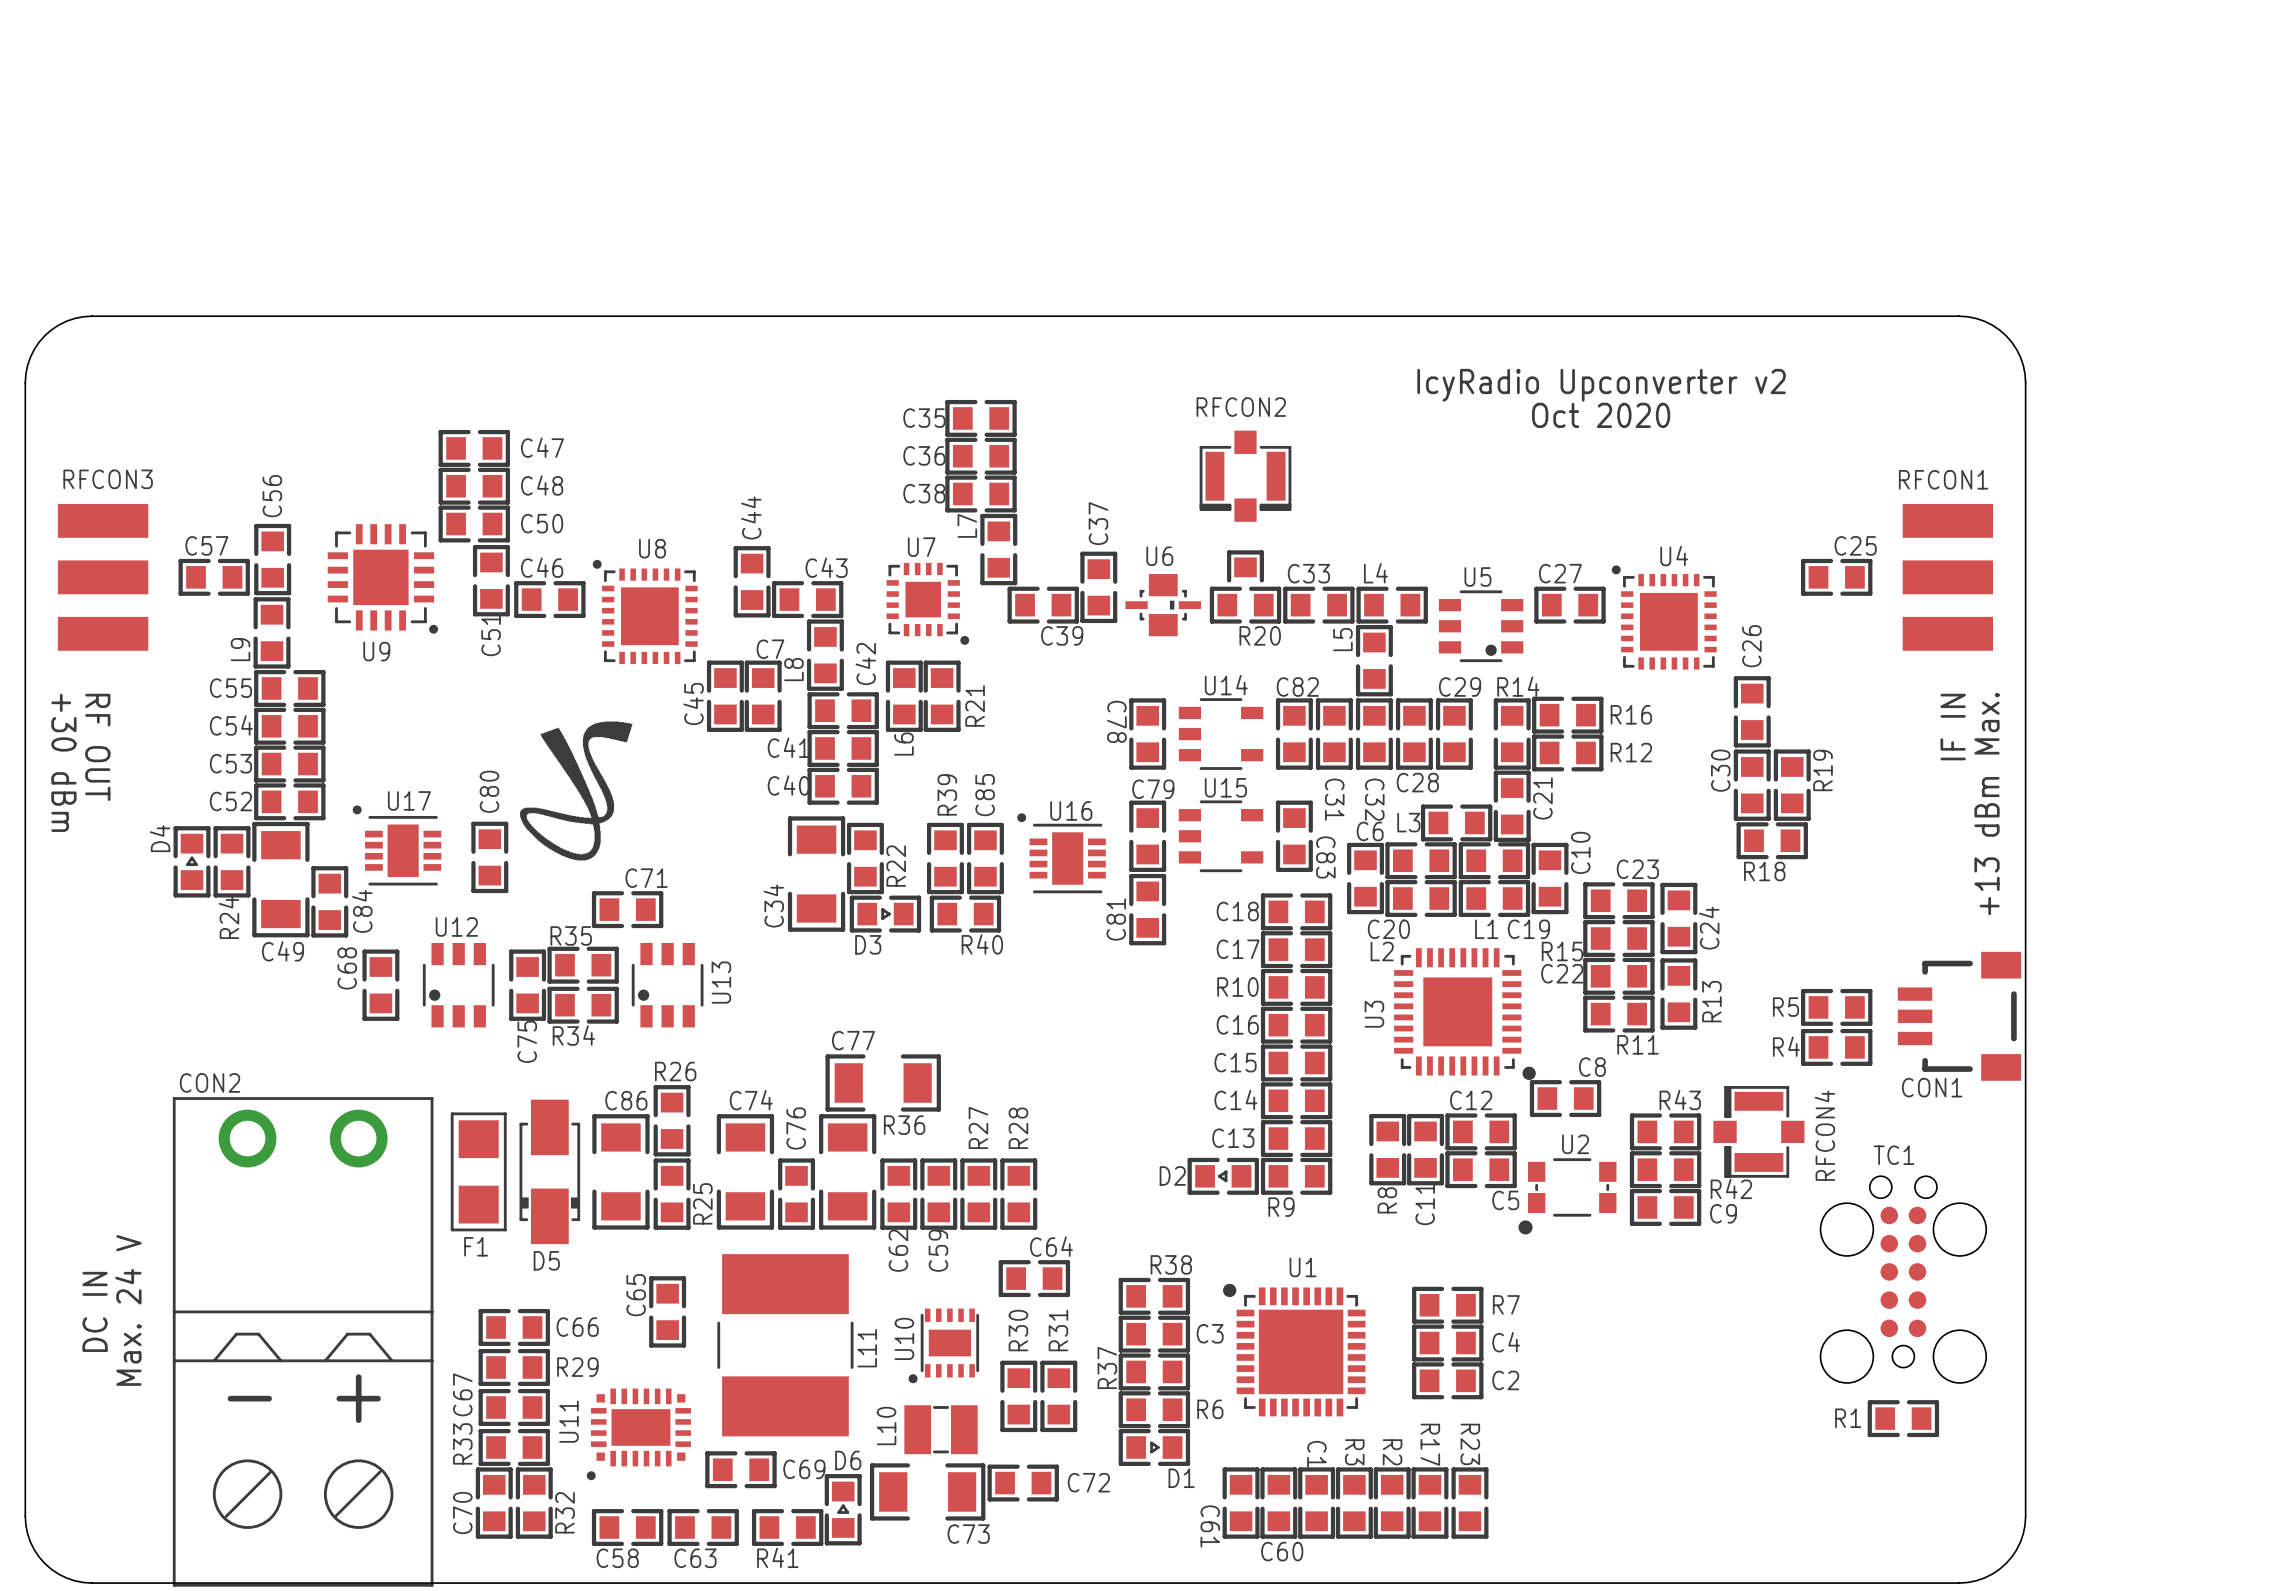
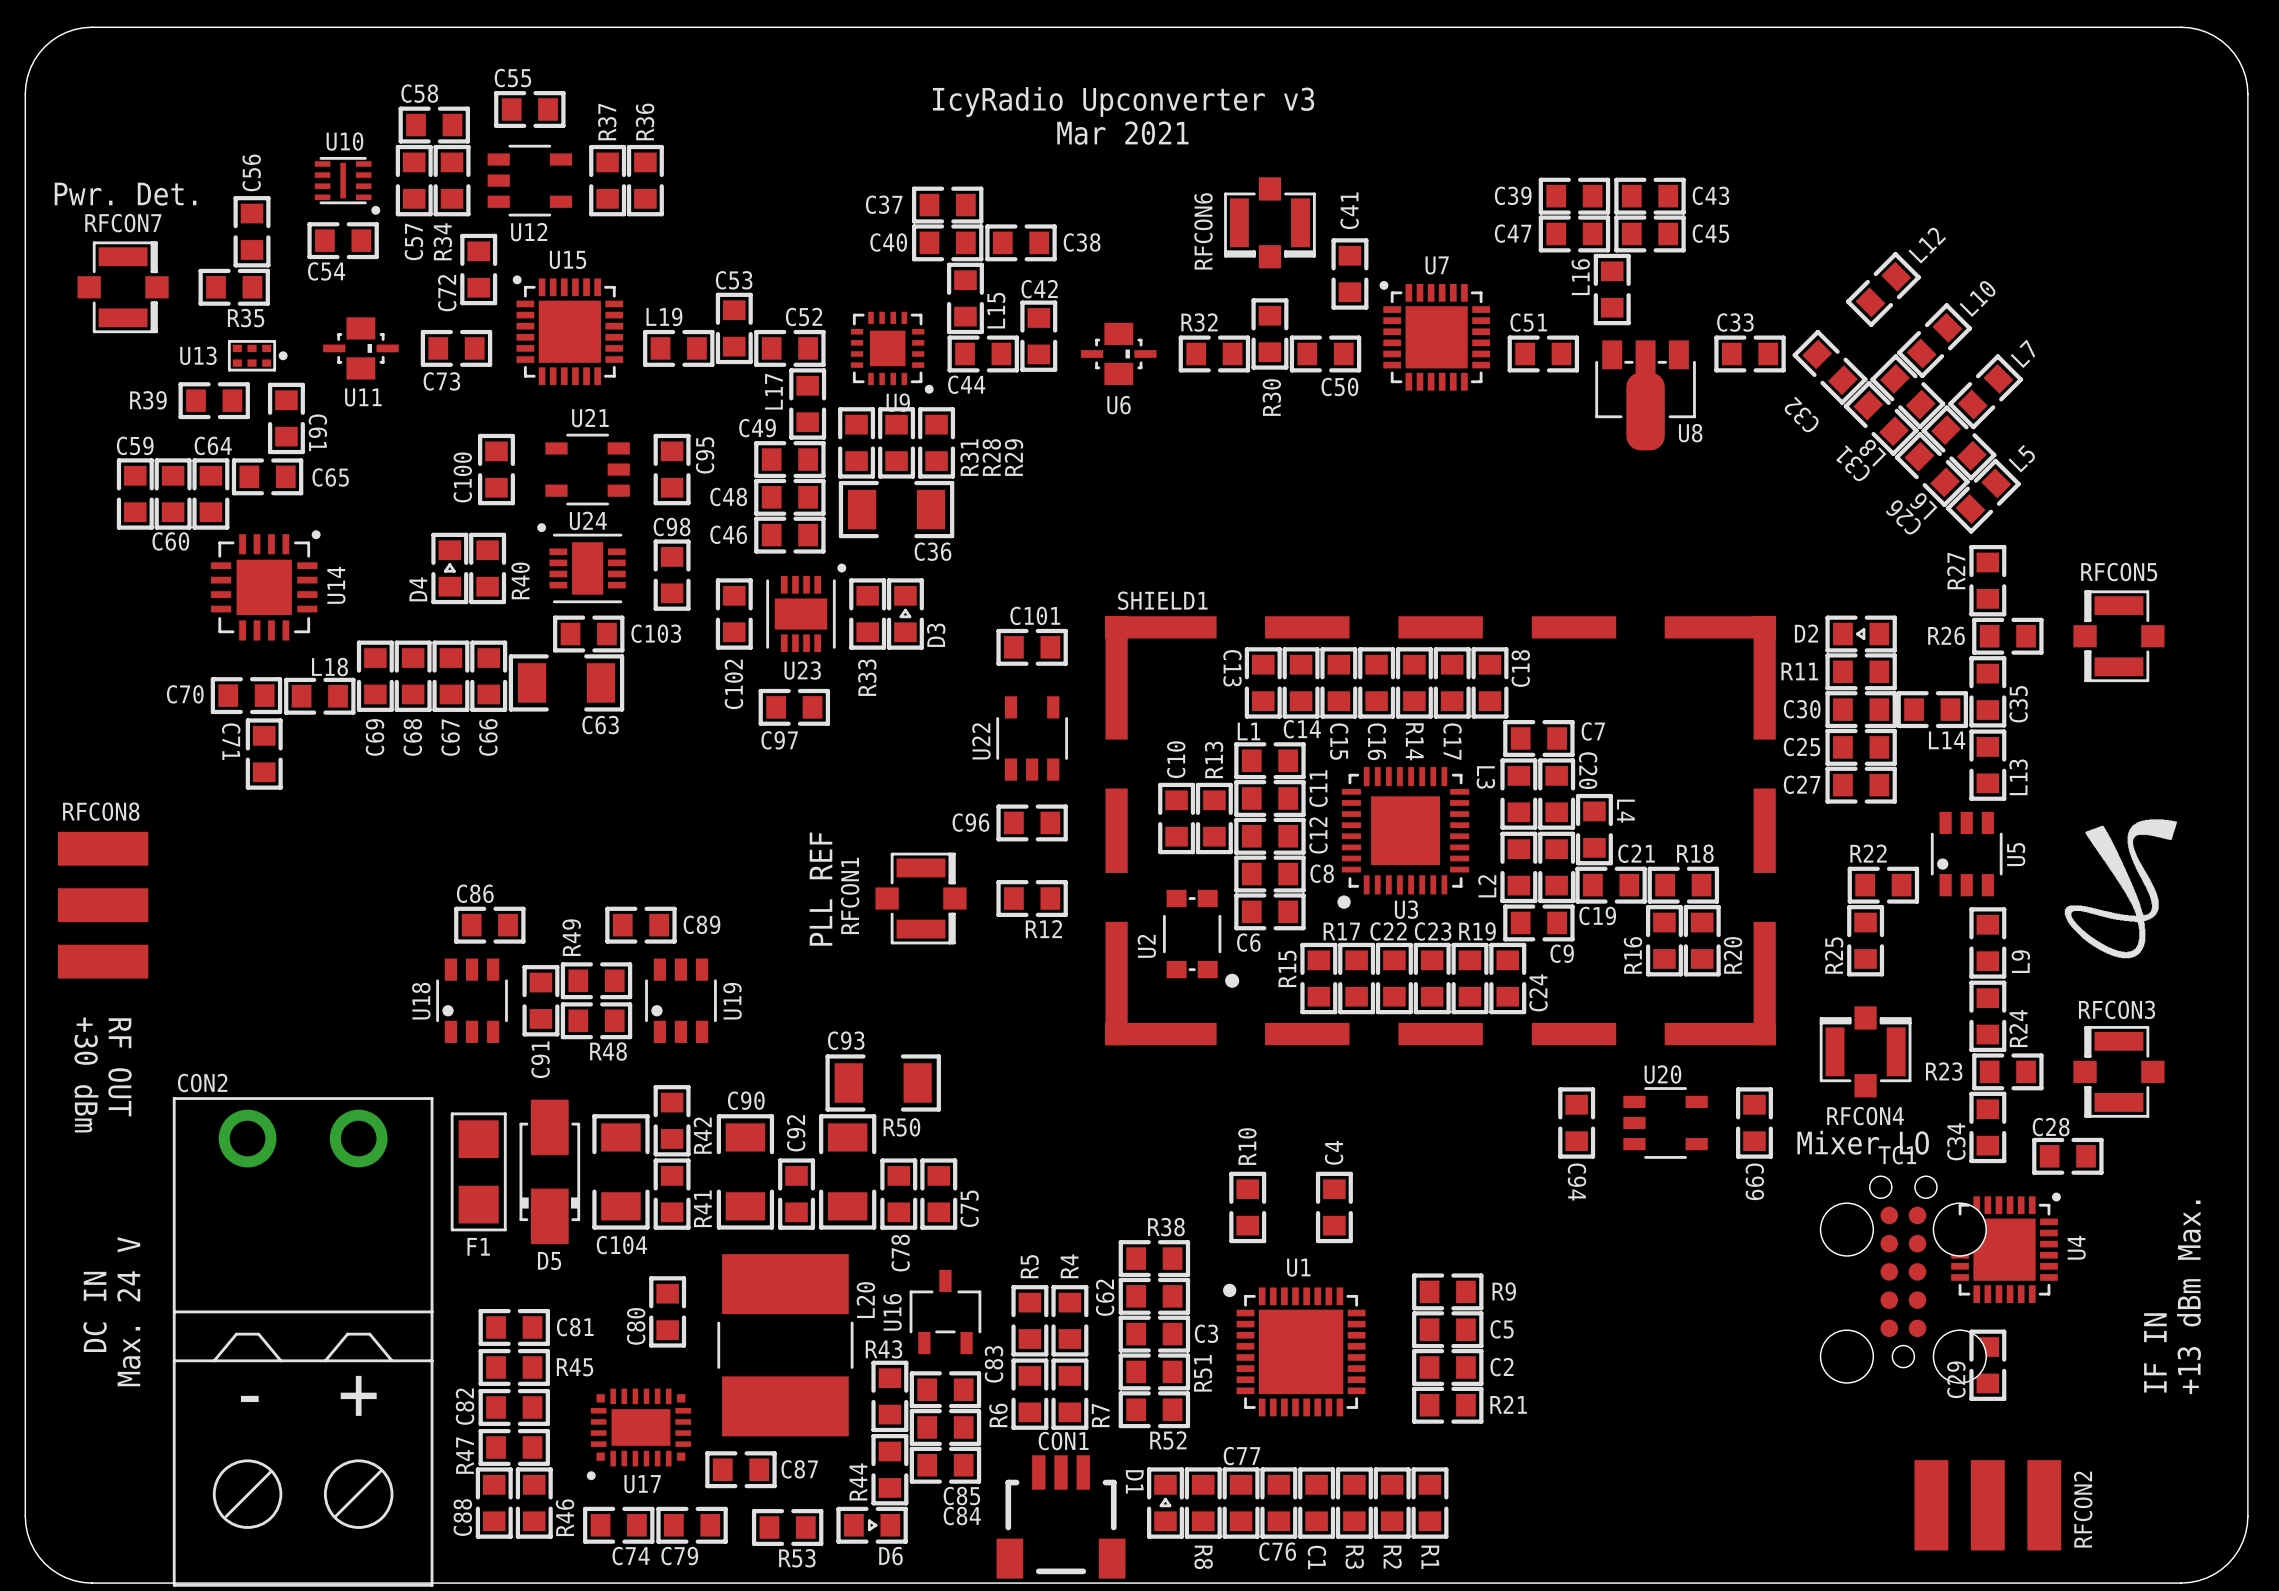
text: none -> IcyRadio Upconverter v3 (1123, 101)
text: none -> Mar 2021 (1122, 133)
R37: none -> (607, 180)
R36: none -> (645, 180)
text: none -> Pwr. Det. (125, 194)
RFCON6: none -> (1269, 222)
RFCON7: none -> (123, 287)
L16: none -> (1612, 289)
L12: none -> (1883, 289)
L15: none -> (965, 298)
U11: none -> (360, 348)
L19: none -> (678, 348)
R32: none -> (1214, 353)
board edge: (25, 382) (30, 357) (44, 335) (66, 321) (91, 316) (1958, 316) (1976, 318) (1992, 325) (2006, 335) (2016, 349) (2023, 365) (2025, 382) (2025, 1516) (2020, 1541) (2006, 1563) (1984, 1577) (1958, 1583) -> (25, 382) (25, 85) (34, 60) (44, 46) (58, 36) (83, 27) (2181, 27) (2198, 29) (2214, 36) (2228, 46) (2238, 60) (2245, 76) (2247, 93) (2247, 1525) (2242, 1541) (2234, 1556) (2221, 1569) (2198, 1580) (2181, 1583) (1958, 1583)
text: IcyRadio Upconverter v2 (1601, 385) -> none
L17: none -> (807, 403)
RFCON2 name position: RFCON2 (1241, 407) -> RFCON2 (2083, 1509)
text: Oct 2020 (1601, 415) -> none
C61: none -> (286, 418)
C35 name position: C35 (924, 418) -> C35 (2018, 704)
C35 rotation: 0° (981, 418) -> 90° clockwise (1987, 691)
C35 position: (981, 418) -> (1987, 691)
RFCON2 footprint: [1199, 430, 1292, 522] -> [1914, 1460, 2062, 1551]
C36 footprint: [945, 437, 1017, 475] -> [838, 480, 955, 539]
R29: none -> (936, 442)
C47 name position: C47 (542, 447) -> C47 (1513, 233)
C47 position: (474, 448) -> (1574, 233)
C36 name position: C36 (924, 455) -> C36 (932, 551)
C100: none -> (496, 469)
U21: none -> (587, 469)
C95: none -> (672, 469)
C65: none -> (267, 476)
RFCON1 name position: RFCON1 (1943, 479) -> RFCON1 (850, 895)
C48 name position: C48 (542, 485) -> C48 (728, 497)
C48 position: (474, 486) -> (789, 497)
C38 name position: C38 (924, 493) -> C38 (1082, 242)
C59: none -> (135, 494)
C60: none -> (173, 494)
C38 position: (981, 494) -> (1021, 242)
RFCON3 footprint: [57, 503, 149, 651] -> [2073, 1026, 2165, 1118]
RFCON1 footprint: [1902, 503, 1994, 651] -> [875, 852, 967, 945]
C44 name position: C44 (751, 518) -> C44 (966, 384)
C50 name position: C50 (542, 523) -> C50 (1339, 386)
C37 name position: C37 (1098, 523) -> C37 (884, 204)
U9 footprint: [327, 524, 439, 634] -> [850, 311, 934, 394]
C50 position: (474, 524) -> (1325, 353)
L7 name position: L7 (967, 525) -> L7 (2022, 353)
C57 name position: C57 (206, 545) -> C57 (413, 241)
C25 name position: C25 (1855, 545) -> C25 (1802, 747)
U8 name position: U8 (652, 548) -> U8 (1690, 433)
L7 rotation: 0° (998, 549) -> 45° clockwise (1985, 391)
L7 position: (998, 549) -> (1985, 391)
R20 footprint: [1209, 550, 1282, 624] -> [1683, 905, 1721, 977]
U6 name position: U6 (1159, 556) -> U6 (1119, 405)
U4 name position: U4 (1674, 556) -> U4 (2076, 1247)
C56 position: (272, 559) -> (252, 231)
U8 footprint: [592, 559, 698, 665] -> [1595, 340, 1696, 451]
U7 footprint: [886, 562, 970, 645] -> [1379, 280, 1490, 391]
U24: none -> (581, 563)
U4 footprint: [1611, 565, 1717, 670] -> [1951, 1192, 2061, 1304]
C46 name position: C46 (542, 567) -> C46 (728, 534)
C43 name position: C43 (826, 567) -> C43 (1710, 195)
C27 name position: C27 (1560, 573) -> C27 (1802, 784)
C98: none -> (672, 575)
C57 rotation: 0° (214, 577) -> 90° clockwise (414, 180)
C57 position: (214, 577) -> (414, 180)
C25 position: (1836, 577) -> (1861, 747)
C51 rotation: 0° (491, 580) -> 90° clockwise (1543, 353)
C51 position: (491, 580) -> (1543, 353)
C44 rotation: 0° (752, 581) -> 90° clockwise (983, 353)
C44 position: (752, 581) -> (983, 353)
C37 rotation: 0° (1098, 587) -> 90° clockwise (947, 205)
C37 position: (1098, 587) -> (947, 205)
C46 position: (549, 599) -> (789, 535)
C43 position: (807, 599) -> (1650, 196)
C39 position: (1043, 605) -> (1574, 196)
U6 position: (1163, 605) -> (1118, 353)
C33 position: (1318, 605) -> (1750, 353)
L4 rotation: 0° (1392, 605) -> 90° clockwise (1594, 829)
L4 position: (1392, 605) -> (1594, 829)
C27 position: (1570, 605) -> (1861, 785)
U23: none -> (806, 607)
C102: none -> (734, 614)
R33: none -> (867, 614)
U5 rotation: 0° (1481, 626) -> 90° clockwise (1966, 854)
U5 position: (1481, 626) -> (1966, 854)
L9 position: (272, 632) -> (1987, 942)
C103: none -> (588, 634)
C51 name position: C51 (491, 635) -> C51 (1528, 322)
C39 name position: C39 (1062, 635) -> C39 (1513, 195)
R20 name position: R20 (1260, 635) -> R20 (1733, 955)
R26: none -> (2007, 636)
RFCON5: none -> (2118, 636)
L5 name position: L5 (1342, 639) -> L5 (2021, 458)
C26 name position: C26 (1751, 646) -> C26 (1903, 517)
C101: none -> (1032, 647)
L9 name position: L9 (240, 649) -> L9 (2020, 961)
L8 rotation: 0° (825, 655) -> 45° counterclockwise (1907, 391)
L8 position: (825, 655) -> (1907, 391)
L5 rotation: 0° (1374, 660) -> 45° clockwise (1983, 496)
L5 position: (1374, 660) -> (1983, 496)
C69: none -> (375, 676)
C67: none -> (450, 676)
C66: none -> (488, 676)
U14 name position: U14 (1226, 685) -> U14 (336, 585)
R14 name rotation: 0° (1518, 686) -> 90° clockwise (1414, 741)
R14 name position: R14 (1518, 686) -> R14 (1414, 741)
C29 name rotation: 0° (1460, 687) -> 90° counterclockwise (1956, 1379)
C29 name position: C29 (1460, 687) -> C29 (1956, 1379)
C55 name position: C55 (230, 688) -> C55 (512, 78)
C55 position: (289, 688) -> (529, 109)
C70: none -> (246, 695)
L18: none -> (319, 696)
C45 rotation: 0° (725, 696) -> 90° clockwise (1650, 233)
C45 position: (725, 696) -> (1650, 233)
C7 rotation: 0° (763, 696) -> 90° clockwise (1538, 738)
C7 position: (763, 696) -> (1538, 738)
L6 rotation: 0° (904, 696) -> 45° counterclockwise (1958, 442)
L6 position: (904, 696) -> (1958, 442)
R21 rotation: 0° (942, 696) -> 90° clockwise (1447, 1405)
R21 position: (942, 696) -> (1447, 1405)
U14 footprint: [1178, 698, 1264, 770] -> [211, 530, 321, 641]
C45 name position: C45 (693, 704) -> C45 (1710, 233)
C97: none -> (794, 707)
L14: none -> (1932, 709)
C42 rotation: 0° (843, 710) -> 90° clockwise (1038, 336)
C42 position: (843, 710) -> (1038, 336)
C26 rotation: 0° (1752, 711) -> 45° counterclockwise (1932, 469)
C26 position: (1752, 711) -> (1932, 469)
R16 name position: R16 (1631, 714) -> R16 (1633, 955)
R16 rotation: 0° (1567, 715) -> 90° clockwise (1664, 940)
R16 position: (1567, 715) -> (1664, 940)
drawing: [520, 721, 633, 861] -> none
C54 name position: C54 (231, 725) -> C54 (326, 271)
C54 position: (289, 726) -> (343, 240)
text: IF IN (1953, 727) -> none
C78: (1147, 734) -> none
C82: (1294, 734) -> none
C31 rotation: 0° (1334, 734) -> 45° counterclockwise (1881, 418)
C31 position: (1334, 734) -> (1881, 418)
C32 rotation: 0° (1374, 734) -> 45° counterclockwise (1830, 367)
C32 position: (1374, 734) -> (1830, 367)
C28 rotation: 0° (1414, 734) -> 90° clockwise (2067, 1156)
C28 position: (1414, 734) -> (2067, 1156)
C29 position: (1454, 734) -> (1987, 1365)
R14 position: (1512, 734) -> (1414, 682)
U22: none -> (1032, 738)
text position: RF OUT (97, 747) -> RF OUT (120, 1067)
C41 rotation: 0° (843, 748) -> 90° clockwise (1349, 273)
C41 position: (843, 748) -> (1349, 273)
R12 position: (1567, 752) -> (1032, 898)
R12 name position: R12 (1631, 752) -> R12 (1043, 929)
text position: +30 dBm (63, 762) -> +30 dBm (86, 1074)
C53 rotation: 0° (289, 764) -> 90° clockwise (734, 328)
C53 position: (289, 764) -> (734, 328)
L13: none -> (1987, 765)
R19 name rotation: 0° (1823, 770) -> 90° clockwise (1477, 931)
C28 name position: C28 (1417, 782) -> C28 (2051, 1127)
C30 rotation: 0° (1752, 785) -> 90° clockwise (1861, 709)
C30 position: (1752, 785) -> (1861, 709)
R19 position: (1792, 785) -> (1469, 978)
C40 position: (843, 786) -> (947, 242)
C79 name position: C79 (1153, 789) -> C79 (679, 1556)
R39 name position: R39 (947, 794) -> R39 (148, 400)
C85 name position: C85 (985, 795) -> C85 (961, 1496)
U15 footprint: [1178, 800, 1264, 873] -> [512, 275, 624, 386]
C52 name position: C52 (230, 801) -> C52 (804, 316)
C52 position: (289, 801) -> (789, 348)
text: +13 dBm Max. (1987, 803) -> none
C21 rotation: 0° (1512, 806) -> 90° clockwise (1611, 885)
C21 position: (1512, 806) -> (1611, 885)
U16 name position: U16 (1071, 810) -> U16 (892, 1312)
U16 footprint: [1017, 813, 1106, 894] -> [909, 1269, 982, 1355]
C34 footprint: [787, 816, 846, 932] -> [1969, 1091, 2007, 1164]
drawing: none -> [2064, 819, 2178, 959]
C49 footprint: [252, 821, 310, 938] -> [754, 441, 826, 479]
C96: none -> (1032, 822)
L3 rotation: 0° (1456, 822) -> 90° clockwise (1518, 794)
L3 position: (1456, 822) -> (1518, 794)
SHIELD1: none -> (1440, 830)
C6 name position: C6 (1370, 831) -> C6 (1248, 942)
C79 rotation: 0° (1147, 836) -> 90° clockwise (692, 1525)
C79 position: (1147, 836) -> (692, 1525)
C83 rotation: 0° (1294, 836) -> 90° clockwise (945, 1389)
C83 position: (1294, 836) -> (945, 1389)
D4 name position: D4 (160, 838) -> D4 (418, 589)
R18 position: (1772, 840) -> (1683, 885)
U17: (396, 845) -> none
C10 name position: C10 (1580, 852) -> C10 (1176, 759)
C80: (489, 857) -> none
C83 name position: C83 (1325, 857) -> C83 (994, 1364)
R22 rotation: 0° (865, 858) -> 90° clockwise (1883, 885)
R22 position: (865, 858) -> (1883, 885)
R39 rotation: 0° (945, 858) -> 90° clockwise (214, 400)
R39 position: (945, 858) -> (214, 400)
C85 rotation: 0° (985, 858) -> 90° clockwise (945, 1427)
C85 position: (985, 858) -> (945, 1427)
C20 rotation: 0° (1421, 860) -> 90° clockwise (1556, 794)
C20 position: (1421, 860) -> (1556, 794)
C19 rotation: 0° (1494, 860) -> 90° clockwise (1556, 867)
C19 position: (1494, 860) -> (1556, 867)
D4 position: (192, 861) -> (449, 568)
R24 position: (232, 861) -> (1987, 1016)
R22 name position: R22 (896, 866) -> R22 (1868, 853)
R18 name position: R18 (1764, 871) -> R18 (1695, 853)
C71 name position: C71 (646, 878) -> C71 (231, 741)
C6 rotation: 0° (1365, 878) -> 90° clockwise (1269, 911)
C6 position: (1365, 878) -> (1269, 911)
C10 position: (1549, 878) -> (1176, 818)
text: none -> PLL REF (820, 889)
L2 rotation: 0° (1421, 898) -> 90° clockwise (1518, 867)
L2 position: (1421, 898) -> (1518, 867)
L1 position: (1494, 898) -> (1269, 760)
C23 rotation: 0° (1618, 900) -> 90° clockwise (1432, 978)
C23 position: (1618, 900) -> (1432, 978)
C84 rotation: 0° (329, 901) -> 90° clockwise (945, 1465)
C84 position: (329, 901) -> (945, 1465)
RFCON8: none -> (103, 905)
C71 rotation: 0° (627, 909) -> 90° clockwise (264, 754)
C71 position: (627, 909) -> (264, 754)
C81: (1147, 909) -> none
C18 name position: C18 (1237, 911) -> C18 (1520, 668)
C18 rotation: 0° (1296, 911) -> 90° clockwise (1489, 682)
C18 position: (1296, 911) -> (1489, 682)
D3 rotation: 0° (885, 914) -> 90° counterclockwise (905, 614)
D3 position: (885, 914) -> (905, 614)
R40 rotation: 0° (965, 914) -> 90° clockwise (487, 568)
R40 position: (965, 914) -> (487, 568)
R24 name position: R24 (229, 917) -> R24 (2018, 1028)
C24 position: (1678, 918) -> (1507, 978)
C86: none -> (489, 925)
C89: none -> (640, 925)
U12 name position: U12 (456, 927) -> U12 (529, 232)
C20 name position: C20 (1388, 929) -> C20 (1588, 770)
L1 name position: L1 (1486, 929) -> L1 (1249, 731)
R35 name position: R35 (571, 935) -> R35 (246, 318)
R15 rotation: 0° (1618, 938) -> 90° clockwise (1318, 978)
R15 position: (1618, 938) -> (1318, 978)
R25: none -> (1865, 940)
U12 footprint: [422, 942, 495, 1028] -> [487, 144, 573, 217]
U13 footprint: [631, 942, 704, 1028] -> [227, 340, 288, 372]
C17 name position: C17 (1238, 949) -> C17 (1452, 741)
C17 rotation: 0° (1296, 949) -> 90° clockwise (1452, 682)
C17 position: (1296, 949) -> (1452, 682)
C49 name position: C49 (282, 951) -> C49 (757, 428)
R35 position: (583, 965) -> (234, 287)
C68 name position: C68 (347, 968) -> C68 (412, 737)
C22 rotation: 0° (1618, 976) -> 90° clockwise (1394, 978)
C22 position: (1618, 976) -> (1394, 978)
R17: none -> (1356, 978)
R49: none -> (596, 980)
U13 name position: U13 (721, 982) -> U13 (198, 355)
C68 position: (380, 985) -> (413, 676)
C75 position: (527, 985) -> (540, 1000)
R10 rotation: 0° (1296, 987) -> 90° clockwise (1247, 1207)
R10 position: (1296, 987) -> (1247, 1207)
R13 position: (1678, 994) -> (1214, 818)
U18: none -> (472, 1000)
U19: none -> (680, 1000)
R13 name position: R13 (1711, 1001) -> R13 (1214, 759)
R34 rotation: 0° (583, 1005) -> 90° clockwise (452, 180)
R34 position: (583, 1005) -> (452, 180)
R5 rotation: 0° (1836, 1007) -> 90° clockwise (1029, 1320)
R5 position: (1836, 1007) -> (1029, 1320)
U3 name position: U3 (1374, 1014) -> U3 (1406, 909)
U3 rotation: 0° (1464, 1014) -> 90° clockwise (1403, 837)
U3 position: (1464, 1014) -> (1403, 837)
R11 position: (1618, 1014) -> (1861, 671)
CON1 rotation: 0° (1959, 1016) -> 90° clockwise (1061, 1516)
CON1 position: (1959, 1016) -> (1061, 1516)
R48: none -> (596, 1020)
C16 name position: C16 (1237, 1024) -> C16 (1376, 741)
C16 rotation: 0° (1296, 1025) -> 90° clockwise (1376, 682)
C16 position: (1296, 1025) -> (1376, 682)
C77 name: C77 (853, 1040) -> C93 (846, 1040)
C75 name: C75 (527, 1041) -> C91 (540, 1059)
R11 name position: R11 (1638, 1044) -> R11 (1799, 671)
R4 rotation: 0° (1836, 1047) -> 90° clockwise (1069, 1320)
R4 position: (1836, 1047) -> (1069, 1320)
C15 name position: C15 (1235, 1062) -> C15 (1339, 741)
C15 rotation: 0° (1296, 1062) -> 90° clockwise (1338, 682)
C15 position: (1296, 1062) -> (1338, 682)
C8 name position: C8 (1592, 1067) -> C8 (1322, 873)
R26 name: R26 (675, 1071) -> R42 (702, 1135)
CON1 name position: CON1 (1932, 1087) -> CON1 (1063, 1441)
C8 position: (1565, 1098) -> (1269, 874)
C14 name position: C14 (1235, 1099) -> C14 (1302, 729)
C86 name: C86 (626, 1100) -> C104 (621, 1245)
C74 name: C74 (751, 1100) -> C90 (746, 1100)
C14 rotation: 0° (1296, 1100) -> 90° clockwise (1301, 682)
C14 position: (1296, 1100) -> (1301, 682)
C12 name rotation: 0° (1471, 1100) -> 90° counterclockwise (1318, 835)
C12 name position: C12 (1471, 1100) -> C12 (1318, 835)
C94: none -> (1576, 1122)
U20: none -> (1665, 1122)
C99: none -> (1754, 1122)
R36 name: R36 (904, 1125) -> R50 (901, 1127)
R27 name position: R27 (978, 1127) -> R27 (1956, 571)
C76 name: C76 (796, 1128) -> C92 (796, 1133)
R28 name position: R28 (1018, 1128) -> R28 (991, 457)
C12 position: (1481, 1131) -> (1269, 836)
R43 rotation: 0° (1665, 1131) -> 90° clockwise (889, 1396)
R43 position: (1665, 1131) -> (889, 1396)
RFCON4 rotation: 0° (1758, 1131) -> 90° clockwise (1865, 1051)
RFCON4 position: (1758, 1131) -> (1865, 1051)
C13 rotation: 0° (1296, 1138) -> 90° clockwise (1263, 682)
C13 position: (1296, 1138) -> (1263, 682)
text: none -> Mixer LO (1863, 1142)
R8 position: (1387, 1149) -> (1203, 1503)
C11 rotation: 0° (1425, 1149) -> 90° clockwise (1269, 798)
C11 position: (1425, 1149) -> (1269, 798)
C5 position: (1481, 1169) -> (1447, 1329)
R42: (1665, 1169) -> none
D2 position: (1223, 1176) -> (1861, 634)
R9 position: (1296, 1176) -> (1447, 1291)
R27 position: (978, 1194) -> (1987, 580)
R28 position: (1018, 1194) -> (896, 442)
U2 rotation: 0° (1567, 1196) -> 90° counterclockwise (1201, 938)
U2 position: (1567, 1196) -> (1201, 938)
R8 name rotation: 0° (1387, 1200) -> 180° (1203, 1557)
C5 name position: C5 (1505, 1200) -> C5 (1502, 1329)
R25 name: R25 (702, 1203) -> R41 (702, 1208)
C11 name position: C11 (1425, 1204) -> C11 (1318, 788)
R9 name position: R9 (1281, 1207) -> R9 (1504, 1291)
C9 position: (1665, 1207) -> (1538, 922)
C9 name position: C9 (1723, 1213) -> C9 (1562, 953)
C62 name: C62 (898, 1250) -> C78 (900, 1253)
C59 name: C59 (938, 1250) -> C75 (969, 1208)
R38: none -> (1154, 1258)
D5 name position: D5 (546, 1260) -> D5 (549, 1260)
R38 name: R38 (1171, 1264) -> C62 (1105, 1297)
C64 rotation: 0° (1034, 1278) -> 90° clockwise (210, 494)
C64 position: (1034, 1278) -> (210, 494)
text: none -> +13 dBm Max. (2188, 1297)
C65 name: C65 (636, 1295) -> C80 (636, 1326)
R7 rotation: 0° (1447, 1305) -> 90° clockwise (1069, 1394)
R7 position: (1447, 1305) -> (1069, 1394)
U10 footprint: [908, 1308, 980, 1384] -> [314, 156, 381, 215]
C66 name: C66 (577, 1327) -> C81 (575, 1327)
R30 name position: R30 (1018, 1330) -> R30 (1271, 397)
R31 name position: R31 (1058, 1330) -> R31 (969, 457)
C4 name position: C4 (1506, 1342) -> C4 (1334, 1152)
C4 rotation: 0° (1447, 1343) -> 90° clockwise (1334, 1207)
C4 position: (1447, 1343) -> (1334, 1207)
L11 name: L11 (867, 1348) -> L20 (865, 1300)
text: none -> IF IN (2155, 1352)
R29 name: R29 (577, 1367) -> R45 (575, 1367)
R37 name: R37 (1107, 1367) -> R51 (1203, 1373)
C2 position: (1447, 1380) -> (1447, 1367)
C67 name: C67 (462, 1394) -> C82 (465, 1406)
R6: none -> (1029, 1394)
R30 position: (1018, 1396) -> (1269, 333)
R31 position: (1058, 1396) -> (856, 442)
L10 footprint: [904, 1405, 978, 1455] -> [1897, 303, 1972, 379]
R6 name: R6 (1210, 1409) -> R52 (1168, 1440)
R1: (1903, 1418) -> none
U11 name: U11 (568, 1421) -> U17 (642, 1484)
L10 name position: L10 (886, 1426) -> L10 (1977, 298)
R33 name: R33 (462, 1443) -> R47 (465, 1455)
R17 name: R17 (1430, 1444) -> R1 (1430, 1557)
R23 name position: R23 (1470, 1444) -> R23 (1944, 1071)
D1 rotation: 0° (1154, 1447) -> 90° counterclockwise (1165, 1503)
D1 position: (1154, 1447) -> (1165, 1503)
R3 name position: R3 (1354, 1452) -> R3 (1354, 1557)
R2 name position: R2 (1392, 1452) -> R2 (1392, 1557)
C1 name position: C1 (1316, 1454) -> C1 (1316, 1557)
C73 footprint: [869, 1463, 986, 1521] -> [420, 329, 493, 367]
C69 name: C69 (804, 1469) -> C87 (799, 1469)
R44: none -> (889, 1469)
D1 name position: D1 (1181, 1478) -> D1 (1134, 1481)
C72 name position: C72 (1088, 1482) -> C72 (447, 293)
C72 rotation: 0° (1023, 1483) -> 90° clockwise (478, 269)
C72 position: (1023, 1483) -> (478, 269)
R23 rotation: 0° (1469, 1503) -> 90° clockwise (2007, 1071)
R23 position: (1469, 1503) -> (2007, 1071)
C63 footprint: [667, 1509, 739, 1546] -> [508, 654, 625, 712]
D6 rotation: 0° (843, 1509) -> 90° clockwise (872, 1525)
R32 name: R32 (565, 1512) -> R46 (565, 1517)
C70 name: C70 (462, 1513) -> C88 (462, 1517)
C74: none -> (618, 1525)
C61 name: C61 (1210, 1526) -> C77 (1241, 1456)
C58 position: (627, 1527) -> (434, 125)
C73 name position: C73 (968, 1534) -> C73 (441, 381)
C60 name: C60 (1282, 1551) -> C76 (1277, 1551)
R41 name: R41 (777, 1557) -> R53 (797, 1558)
C58 name position: C58 (617, 1558) -> C58 (419, 93)
C63 name position: C63 (695, 1558) -> C63 (600, 725)

